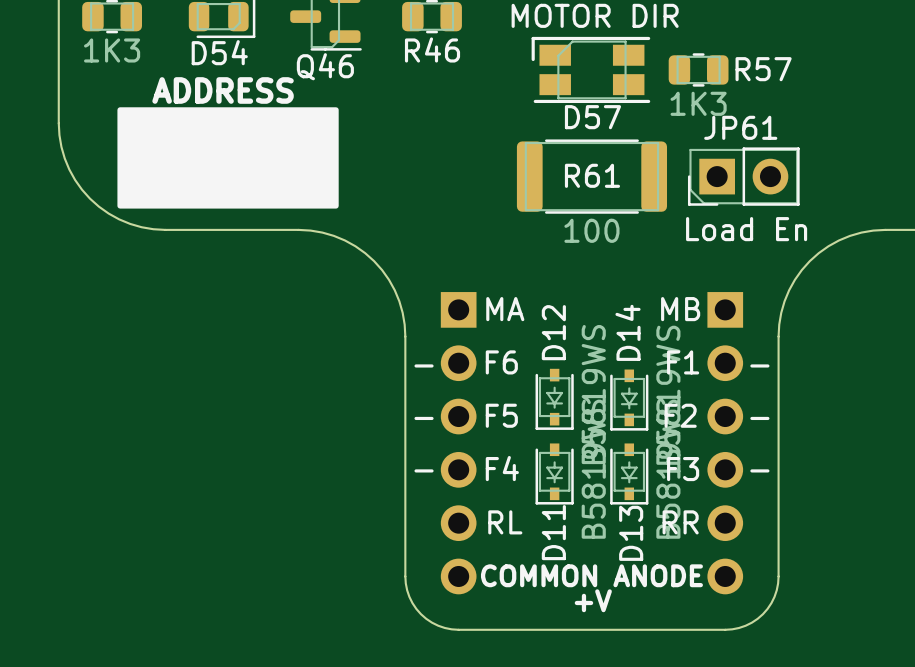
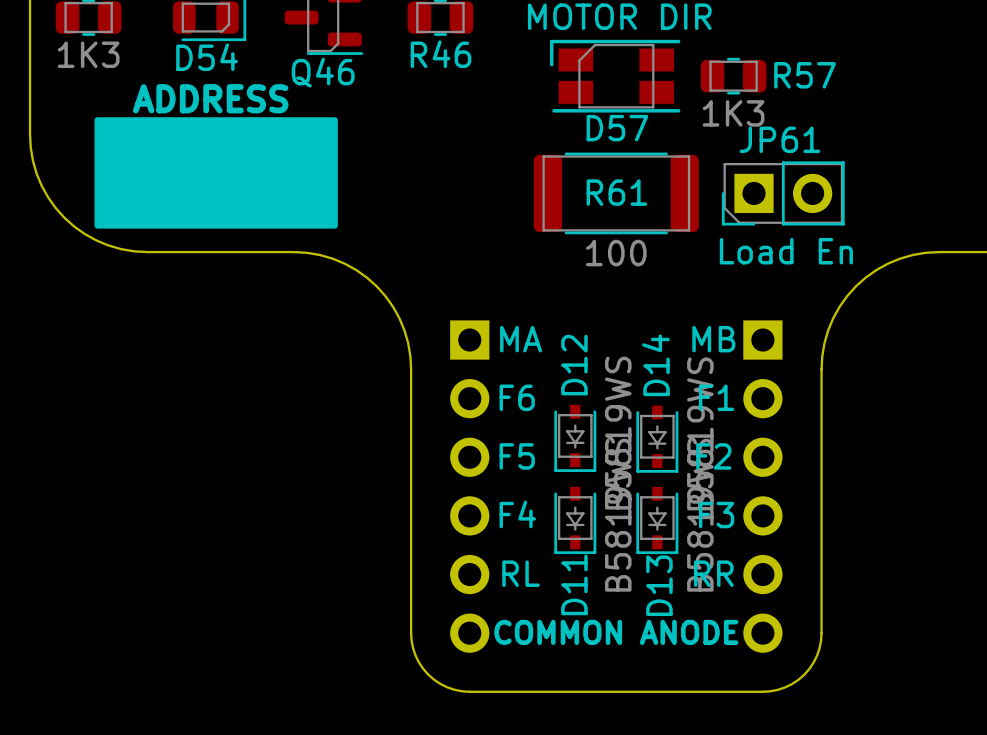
text: - (424, 365) -> none
text: - (759, 365) -> none
text: - (424, 418) -> none
text: - (759, 418) -> none
text: - (424, 470) -> none
text: - (759, 470) -> none
text: +V (593, 600) -> none

